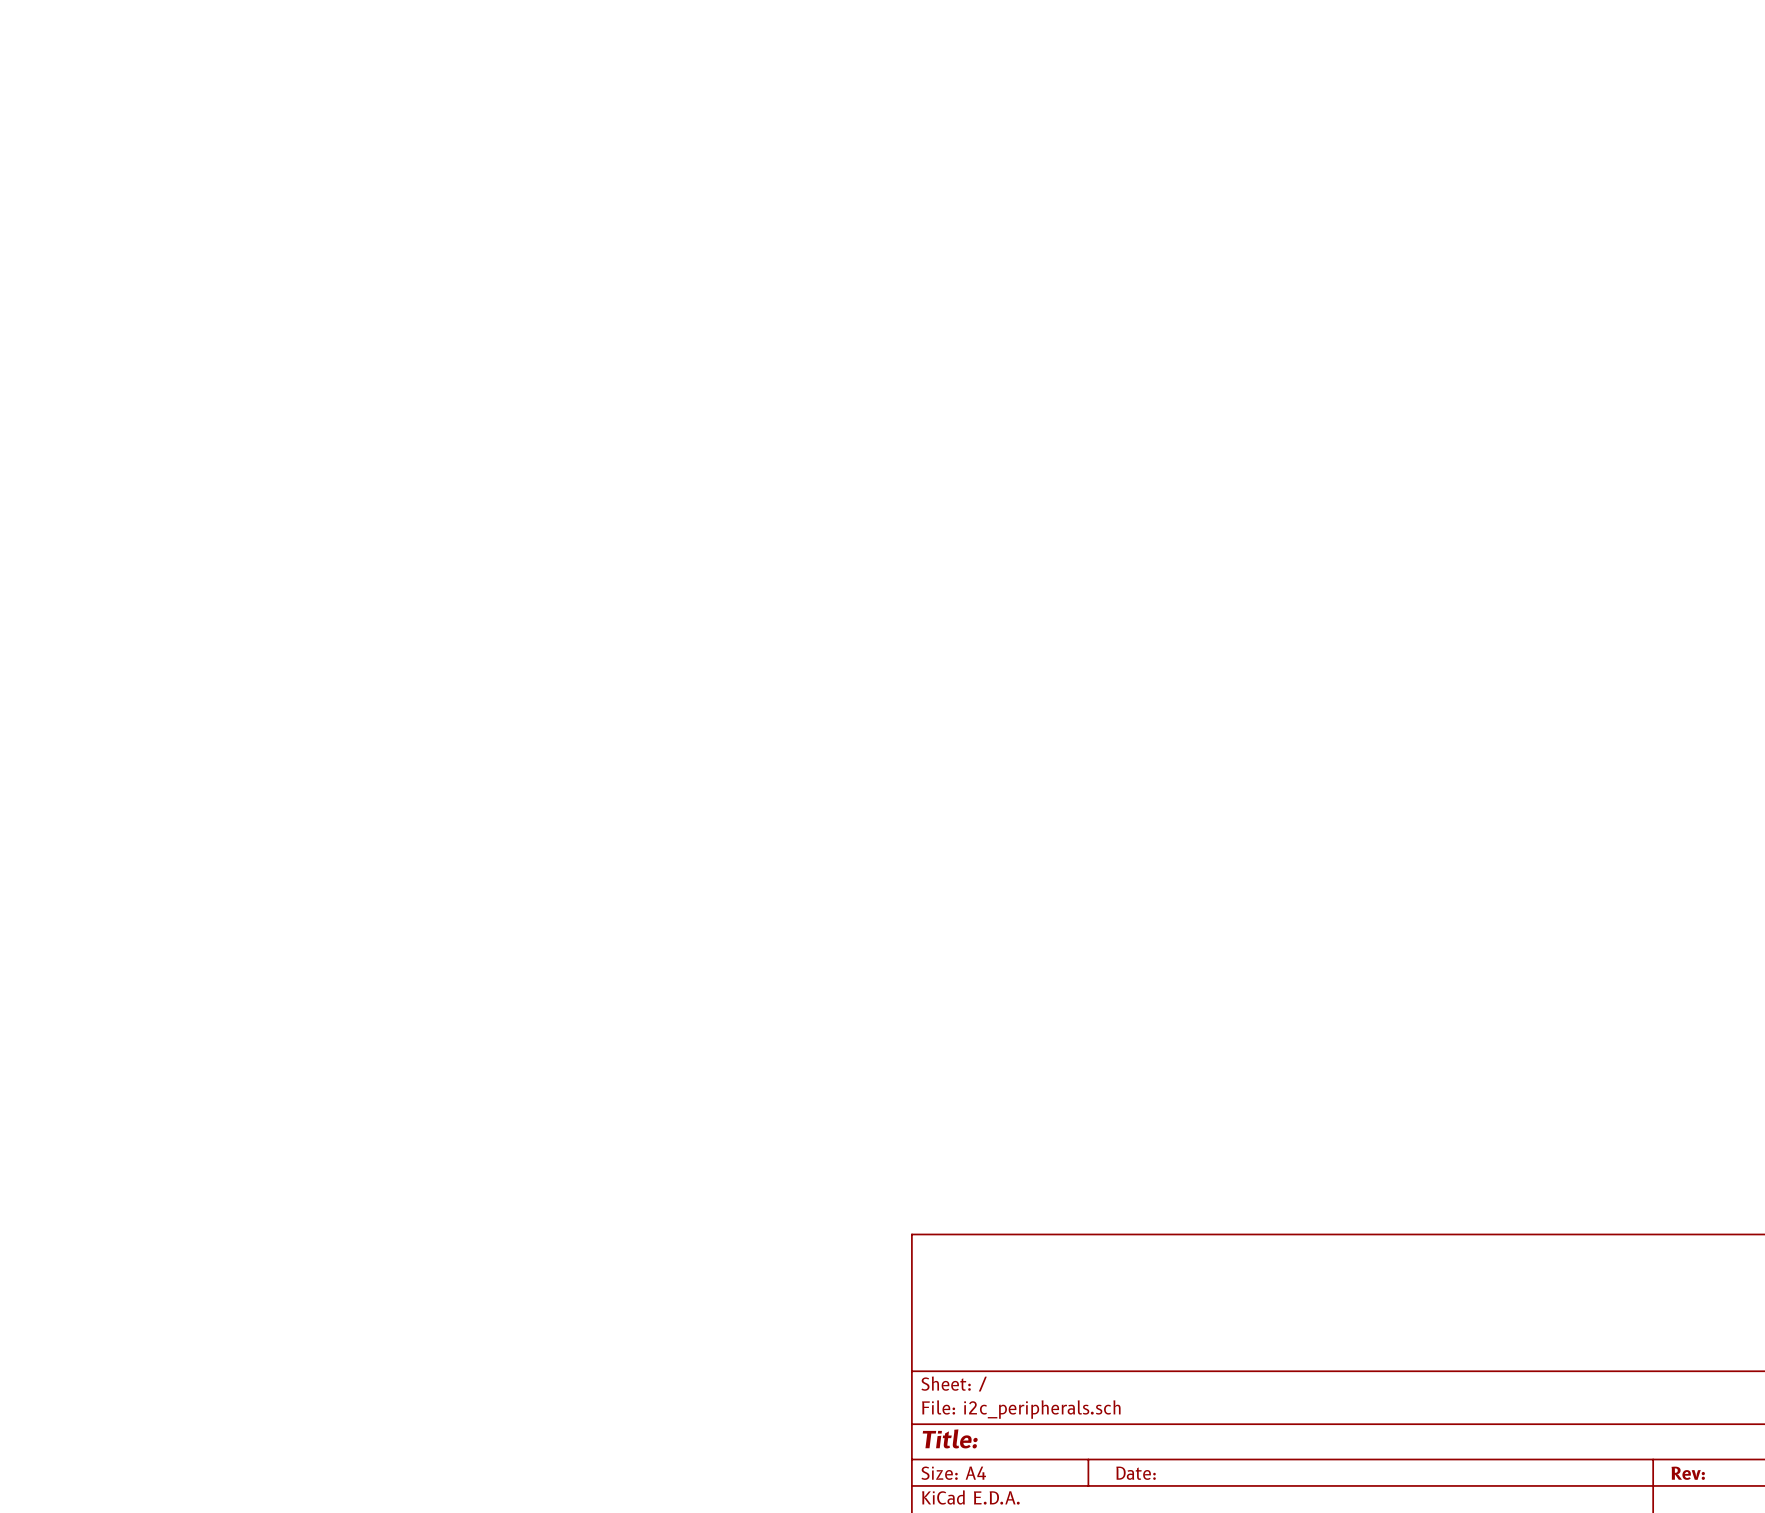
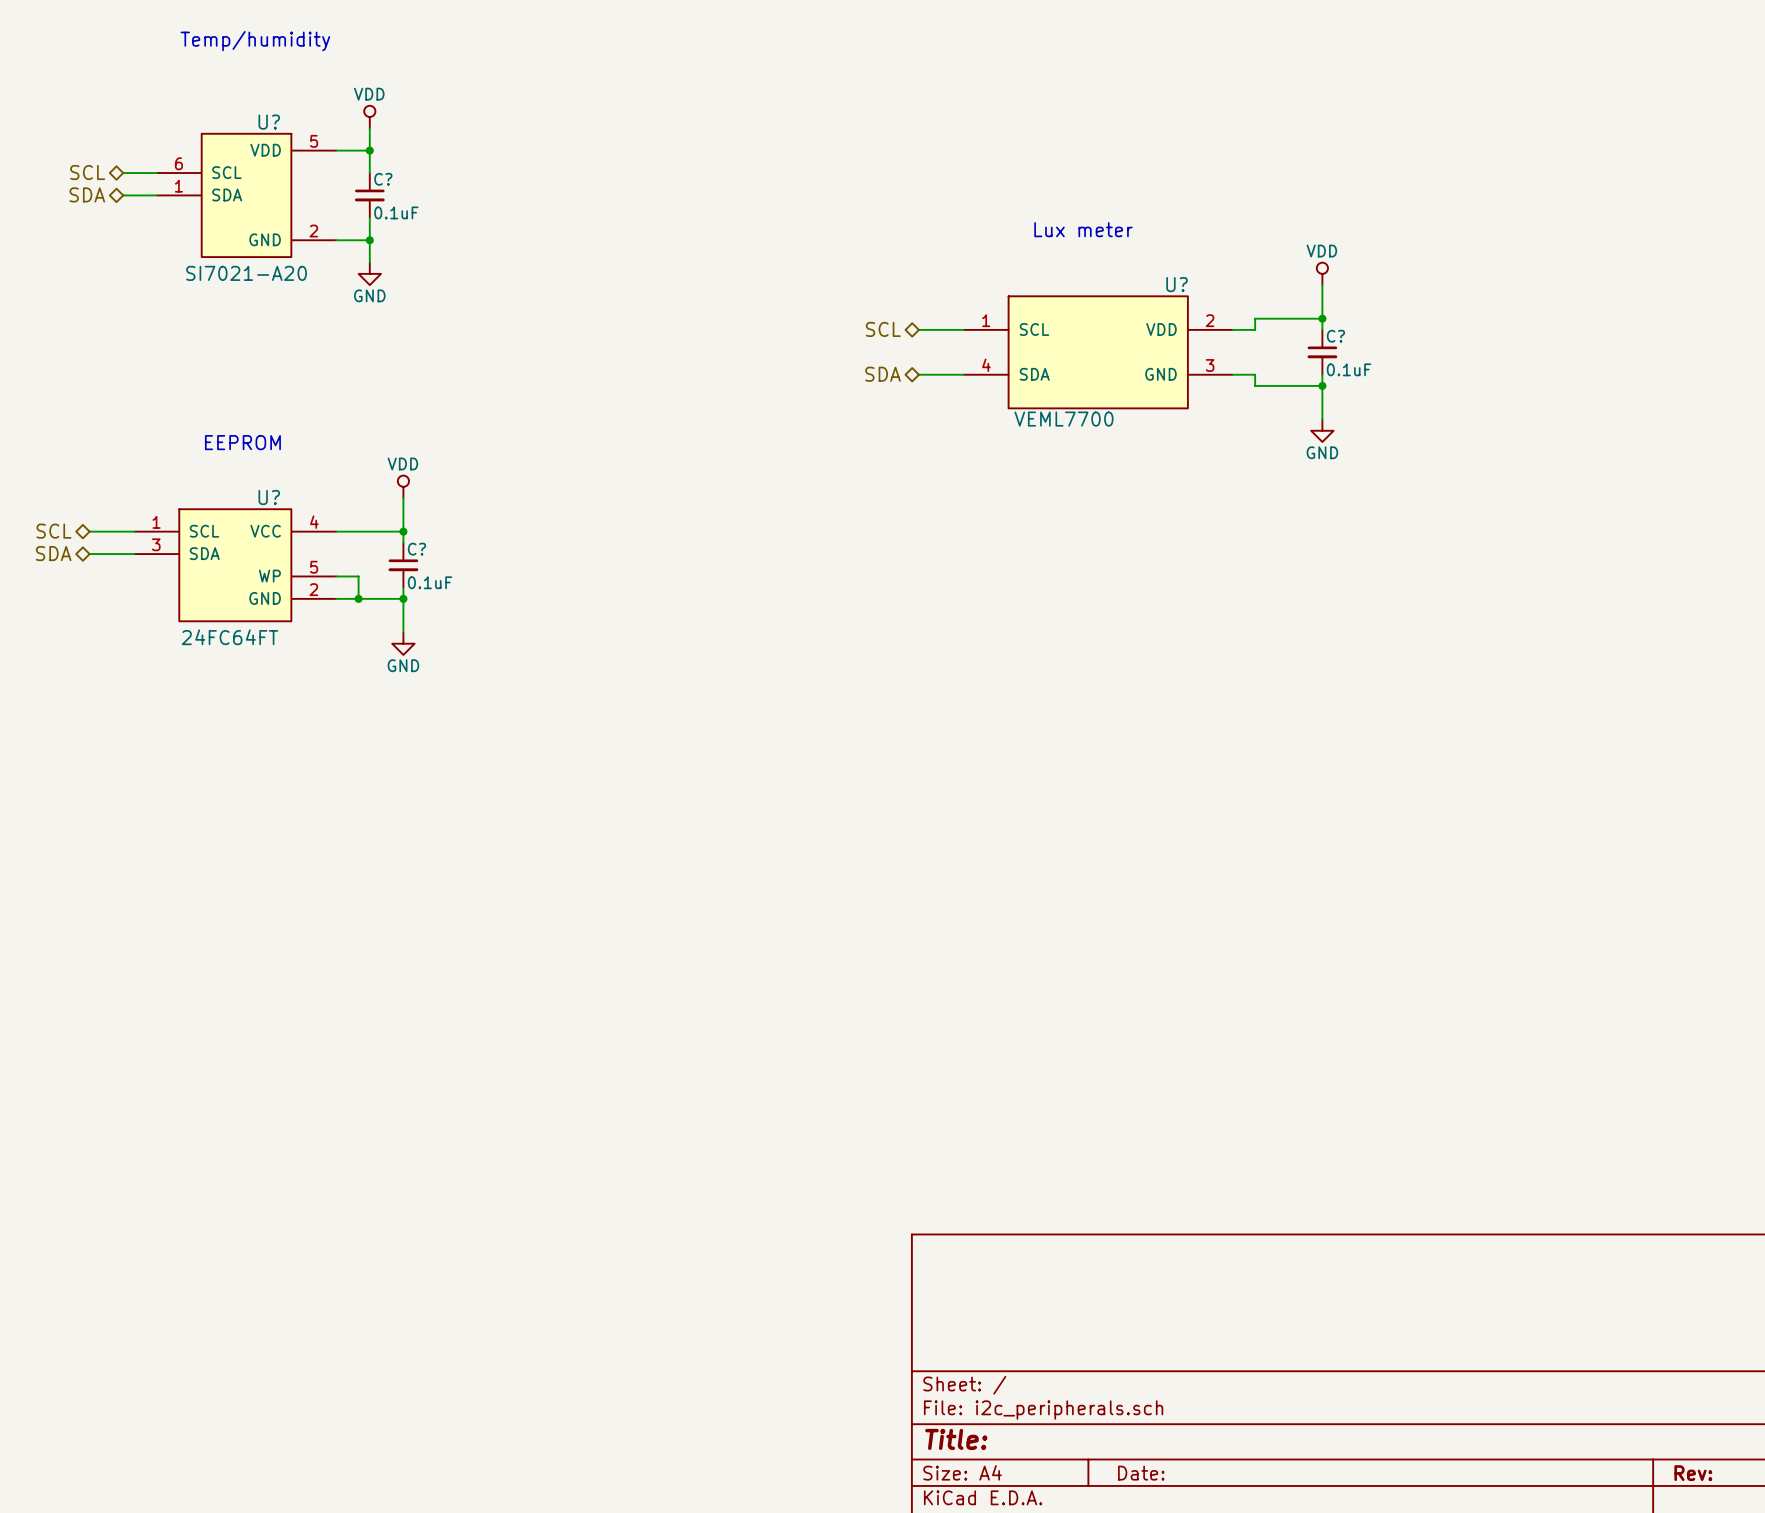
text: none -> Temp/humidity (255, 41)
power symbol: none -> VDD (369, 116)
wire: none -> (369, 128) (369, 173)
wire: none -> (336, 150) (369, 150)
junction: none -> (369, 150)
hierarchical label: none -> SCL (87, 172)
wire: none -> (123, 173) (156, 173)
hierarchical label: none -> SDA (87, 194)
wire: none -> (123, 195) (156, 195)
U?: none -> SI7021-A20 (246, 195)
C?: none -> 0.1uF (369, 195)
wire: none -> (369, 217) (369, 262)
text: none -> Lux meter (1083, 229)
wire: none -> (336, 240) (369, 240)
junction: none -> (369, 240)
power symbol: none -> GND (369, 273)
power symbol: none -> VDD (1322, 273)
wire: none -> (1322, 285) (1322, 329)
wire: none -> (1322, 318) (1255, 318) (1255, 329) (1232, 329)
junction: none -> (1322, 318)
hierarchical label: none -> SCL (883, 329)
wire: none -> (918, 329) (963, 329)
U?: none -> VEML7700 (1098, 352)
C?: none -> 0.1uF (1322, 352)
hierarchical label: none -> SDA (882, 374)
wire: none -> (918, 374) (963, 374)
wire: none -> (1232, 374) (1255, 374) (1255, 385) (1322, 385)
wire: none -> (1322, 374) (1322, 419)
junction: none -> (1322, 385)
power symbol: none -> GND (1322, 430)
text: none -> EEPROM (242, 442)
power symbol: none -> VDD (403, 486)
wire: none -> (403, 498) (403, 542)
hierarchical label: none -> SCL (54, 531)
wire: none -> (89, 531) (134, 531)
wire: none -> (336, 531) (403, 531)
junction: none -> (403, 531)
hierarchical label: none -> SDA (53, 553)
wire: none -> (89, 554) (134, 554)
U?: none -> 24FC64FT (235, 565)
C?: none -> 0.1uF (403, 565)
wire: none -> (336, 576) (358, 576) (358, 598)
wire: none -> (403, 587) (403, 632)
wire: none -> (336, 598) (403, 598)
junction: none -> (358, 598)
junction: none -> (403, 598)
power symbol: none -> GND (403, 643)

